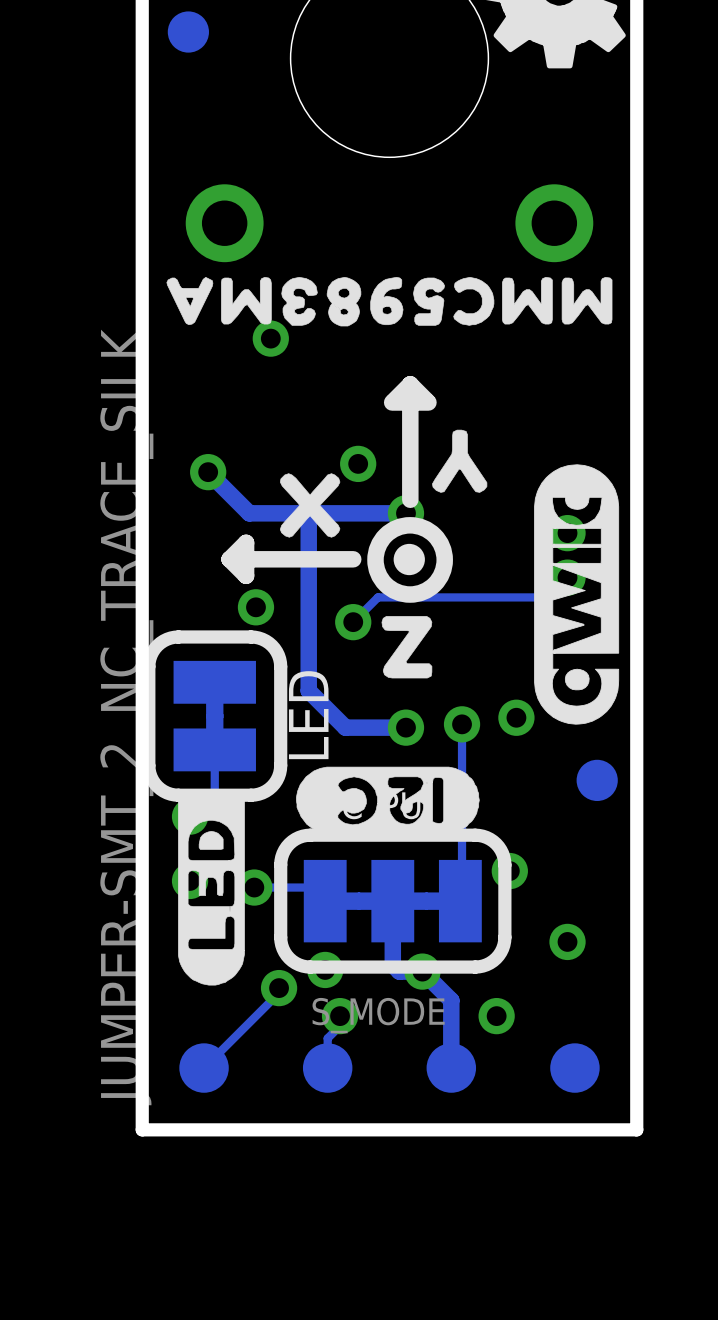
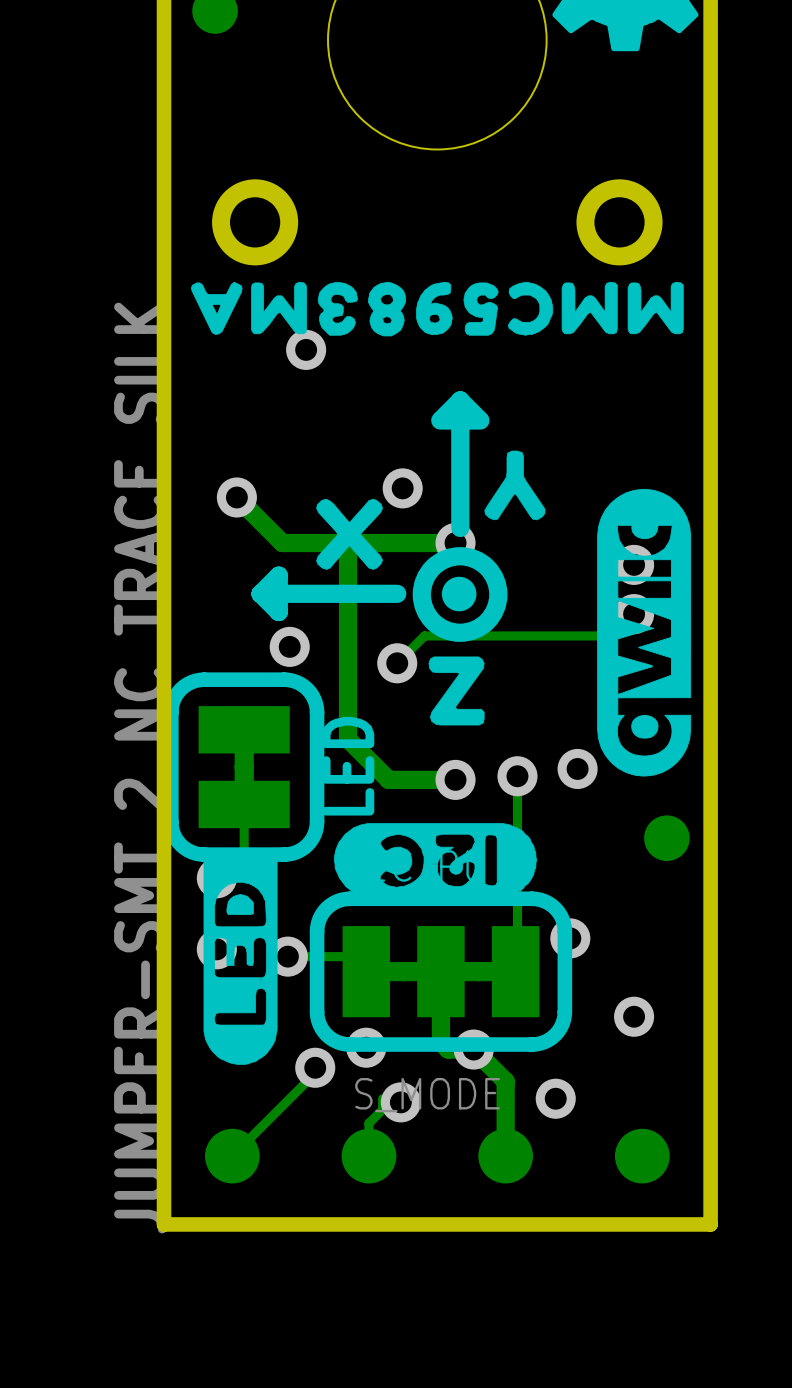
via position: (340, 1016) -> (400, 1102)

